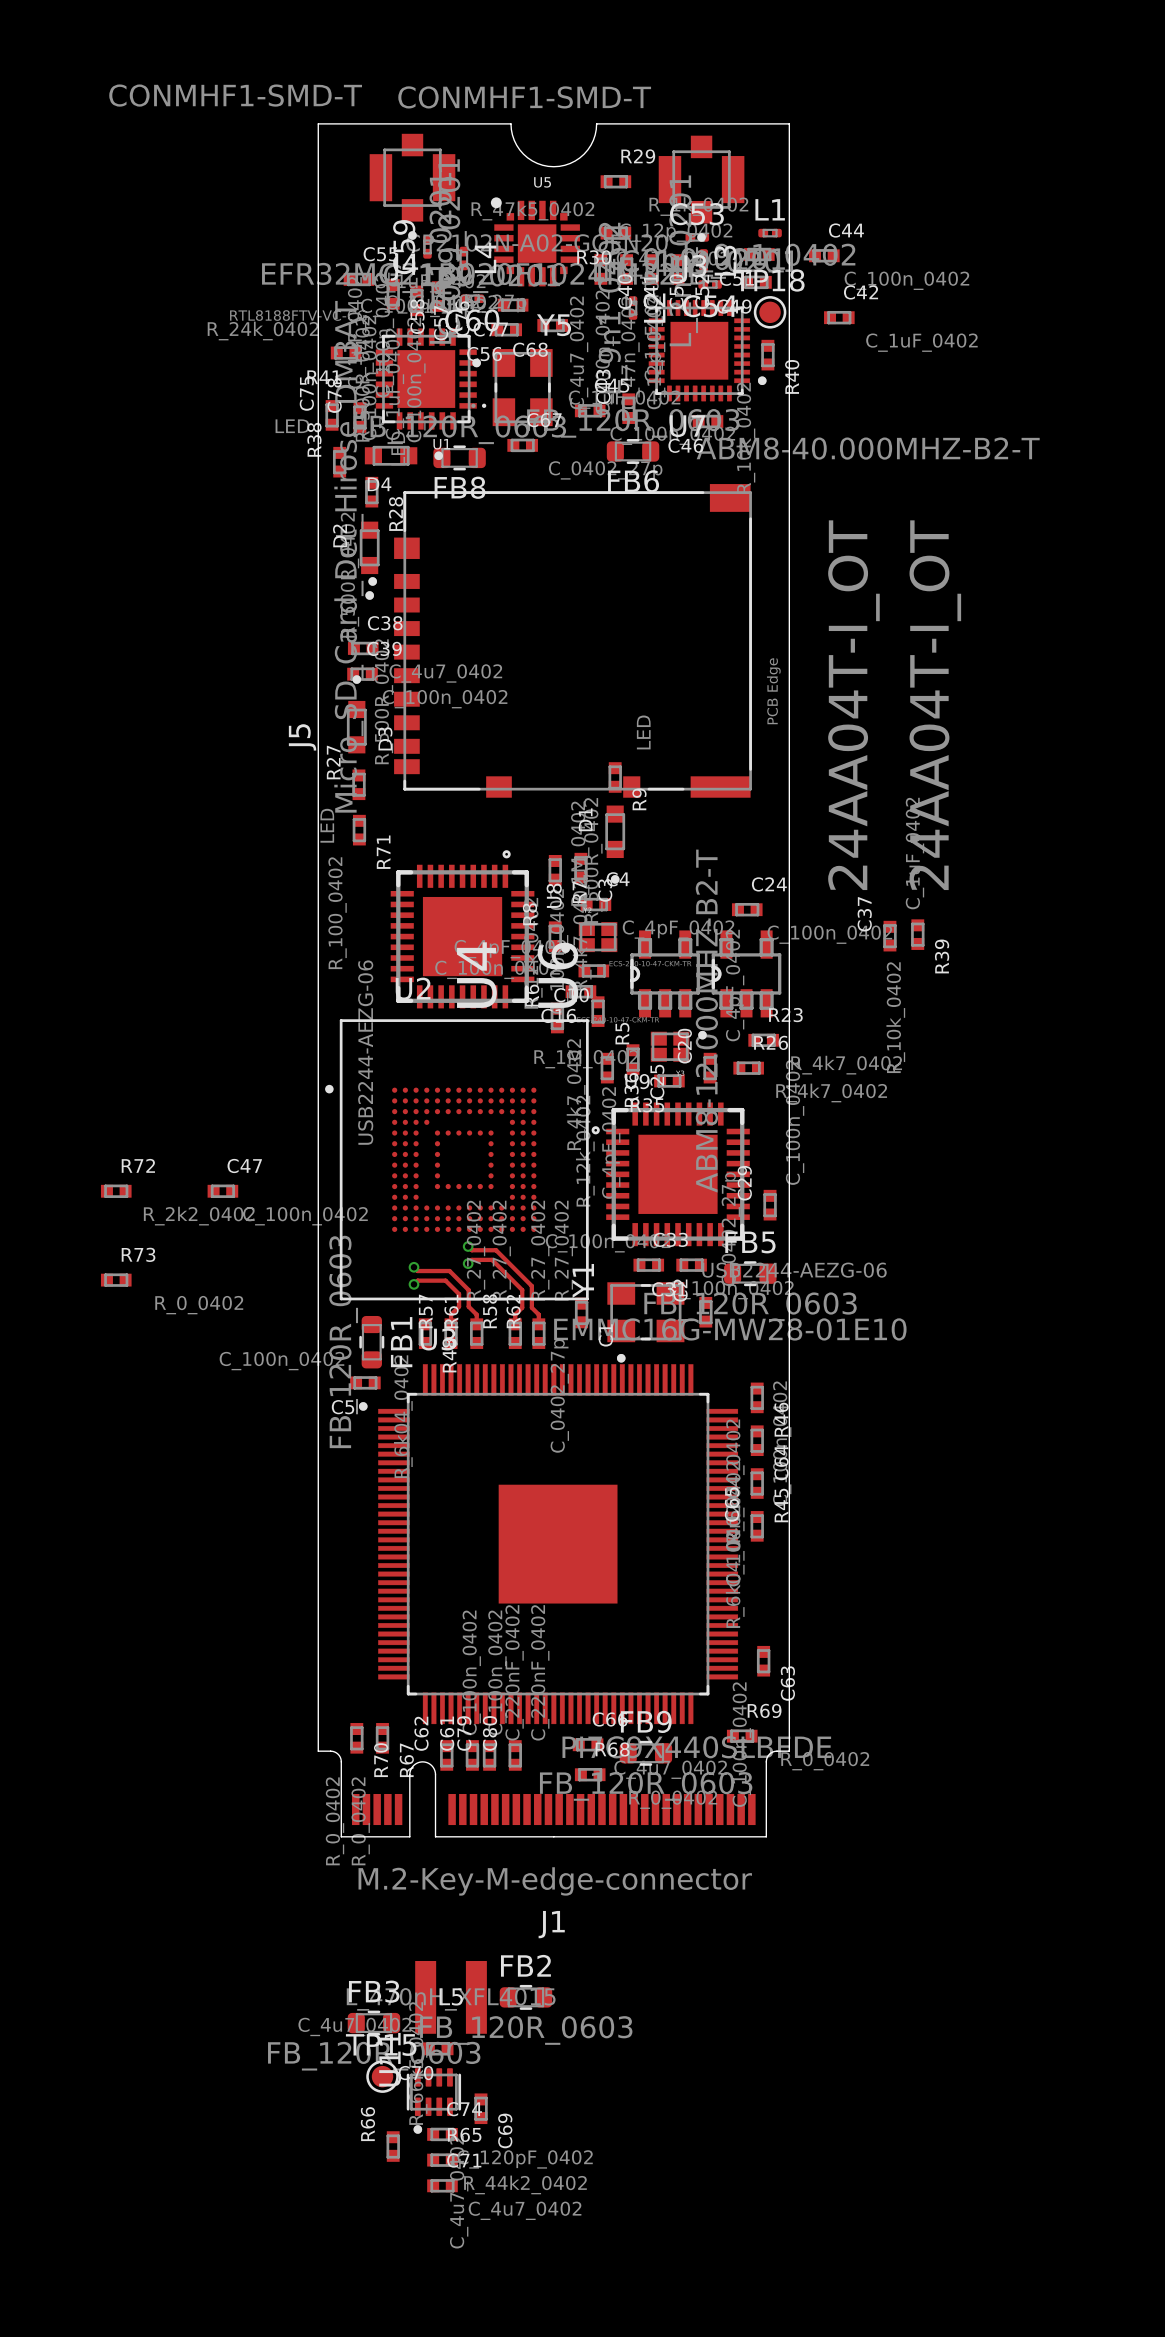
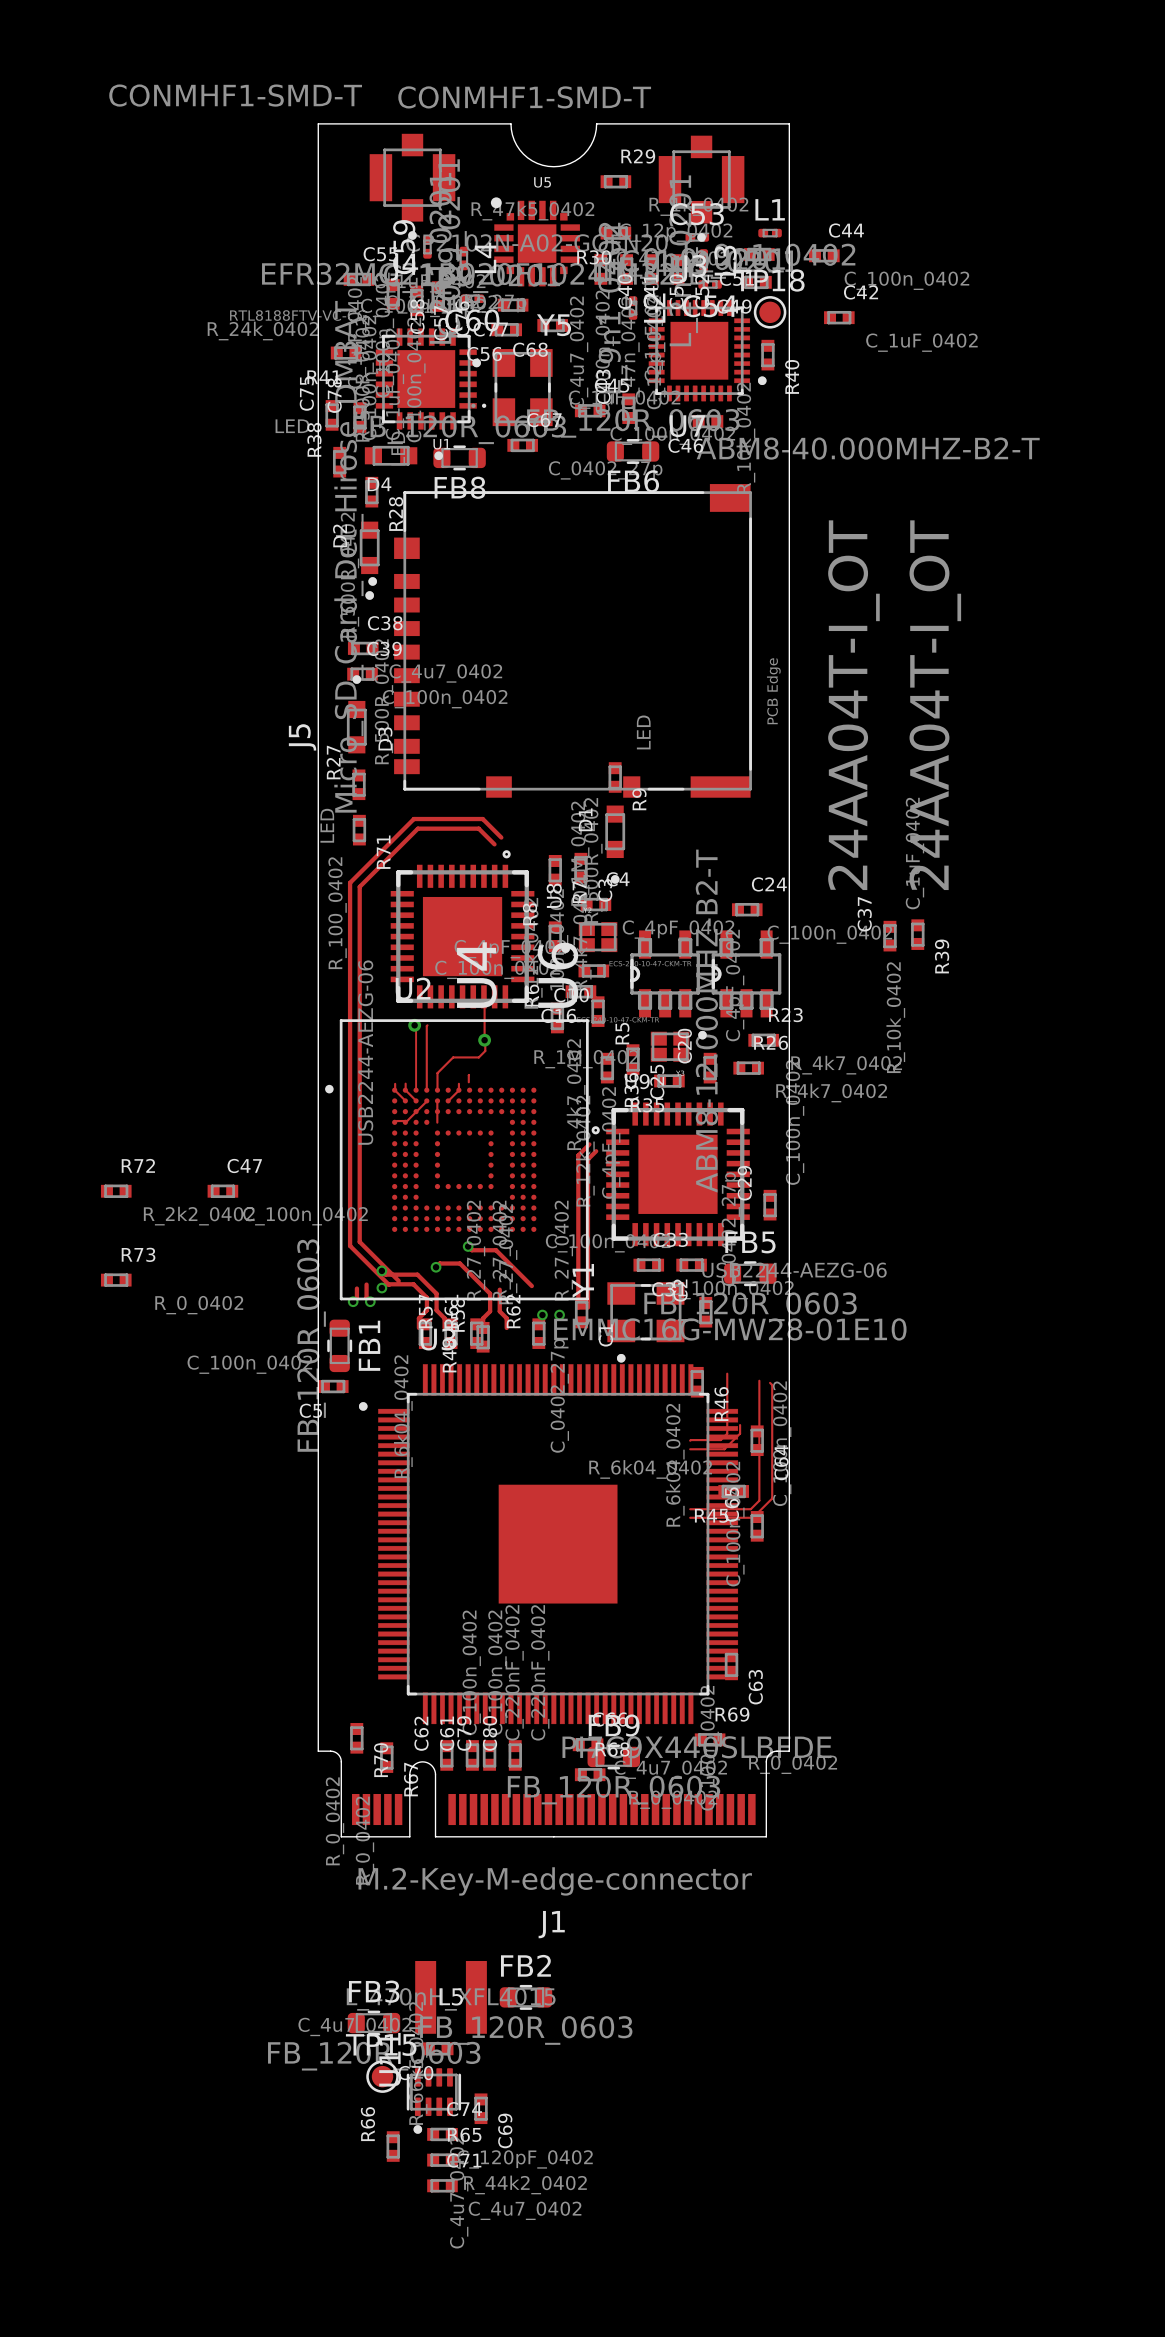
track: none -> (501, 837) (482, 819) (413, 819) (350, 882) (350, 1245) (389, 1284)
track: none -> (494, 844) (478, 828) (417, 828) (359, 886) (359, 1241) (398, 1280)
track: none -> (483, 996) (485, 1051) (478, 1057) (453, 1057) (437, 1073) (437, 1090)
track: none -> (414, 1025) (416, 1090)
via: none -> (414, 1025)
track: none -> (427, 1025) (426, 1090)
via: none -> (484, 1040)
track: none -> (468, 1075) (468, 1082)
track: none -> (395, 1083) (395, 1090) (405, 1100)
track: none -> (405, 1083) (405, 1090) (415, 1100)
track: none -> (458, 1083) (458, 1090) (448, 1100)
track: none -> (426, 1101) (407, 1121) (396, 1121)
track: none -> (437, 1101) (437, 1122)
track: none -> (589, 1144) (578, 1155) (578, 1307)
track: none -> (596, 1151) (587, 1159) (587, 1307)
track: (468, 1263) (471, 1259) (492, 1259) (522, 1290) (522, 1307) (515, 1314) (515, 1324) -> (436, 1267) (439, 1263) (459, 1263) (490, 1293) (490, 1311) (483, 1318) (483, 1327)
via: (468, 1263) -> none
track: (413, 1267) (417, 1271) (449, 1271) (468, 1290) (468, 1306) (476, 1314) (476, 1324) -> (381, 1270) (385, 1274) (417, 1274) (436, 1293) (436, 1310) (444, 1318) (444, 1327)
via: (413, 1267) -> none
via: none -> (436, 1267)
via: none -> (381, 1270)
track: none -> (366, 1284) (366, 1298) (370, 1301)
track: (413, 1284) (417, 1280) (445, 1280) (459, 1294) (459, 1306) (451, 1314) (451, 1324) -> (381, 1288) (385, 1284) (413, 1284) (426, 1297) (426, 1310) (418, 1318) (418, 1327)
via: (413, 1284) -> none
track: (531, 1286) (531, 1307) (538, 1314) (538, 1324) -> (499, 1289) (499, 1311) (506, 1318) (506, 1327)
track: none -> (356, 1288) (356, 1298) (353, 1301)
via: none -> (381, 1288)
via: none -> (353, 1301)
via: none -> (370, 1301)
via: none -> (542, 1315)
via: none -> (559, 1315)
R58 position: (515, 1333) -> (483, 1337)
FB1 position: (371, 1342) -> (339, 1345)
track: none -> (727, 1373) (727, 1433) (720, 1440) (690, 1440)
track: none -> (759, 1380) (759, 1500) (750, 1509) (690, 1509)
C5 position: (365, 1382) -> (333, 1386)
track: none -> (770, 1382) (772, 1385) (772, 1498) (752, 1517) (690, 1517)
R46 position: (757, 1397) -> (697, 1382)
track: none -> (740, 1425) (740, 1433) (724, 1449) (690, 1449)
R45 rotation: 0° (757, 1483) -> 90° clockwise (733, 1491)
R45 position: (757, 1483) -> (733, 1491)
C63 position: (763, 1661) -> (731, 1664)
R69 position: (742, 1736) -> (710, 1739)
R67 position: (382, 1738) -> (386, 1757)
FB9 position: (645, 1753) -> (613, 1756)

